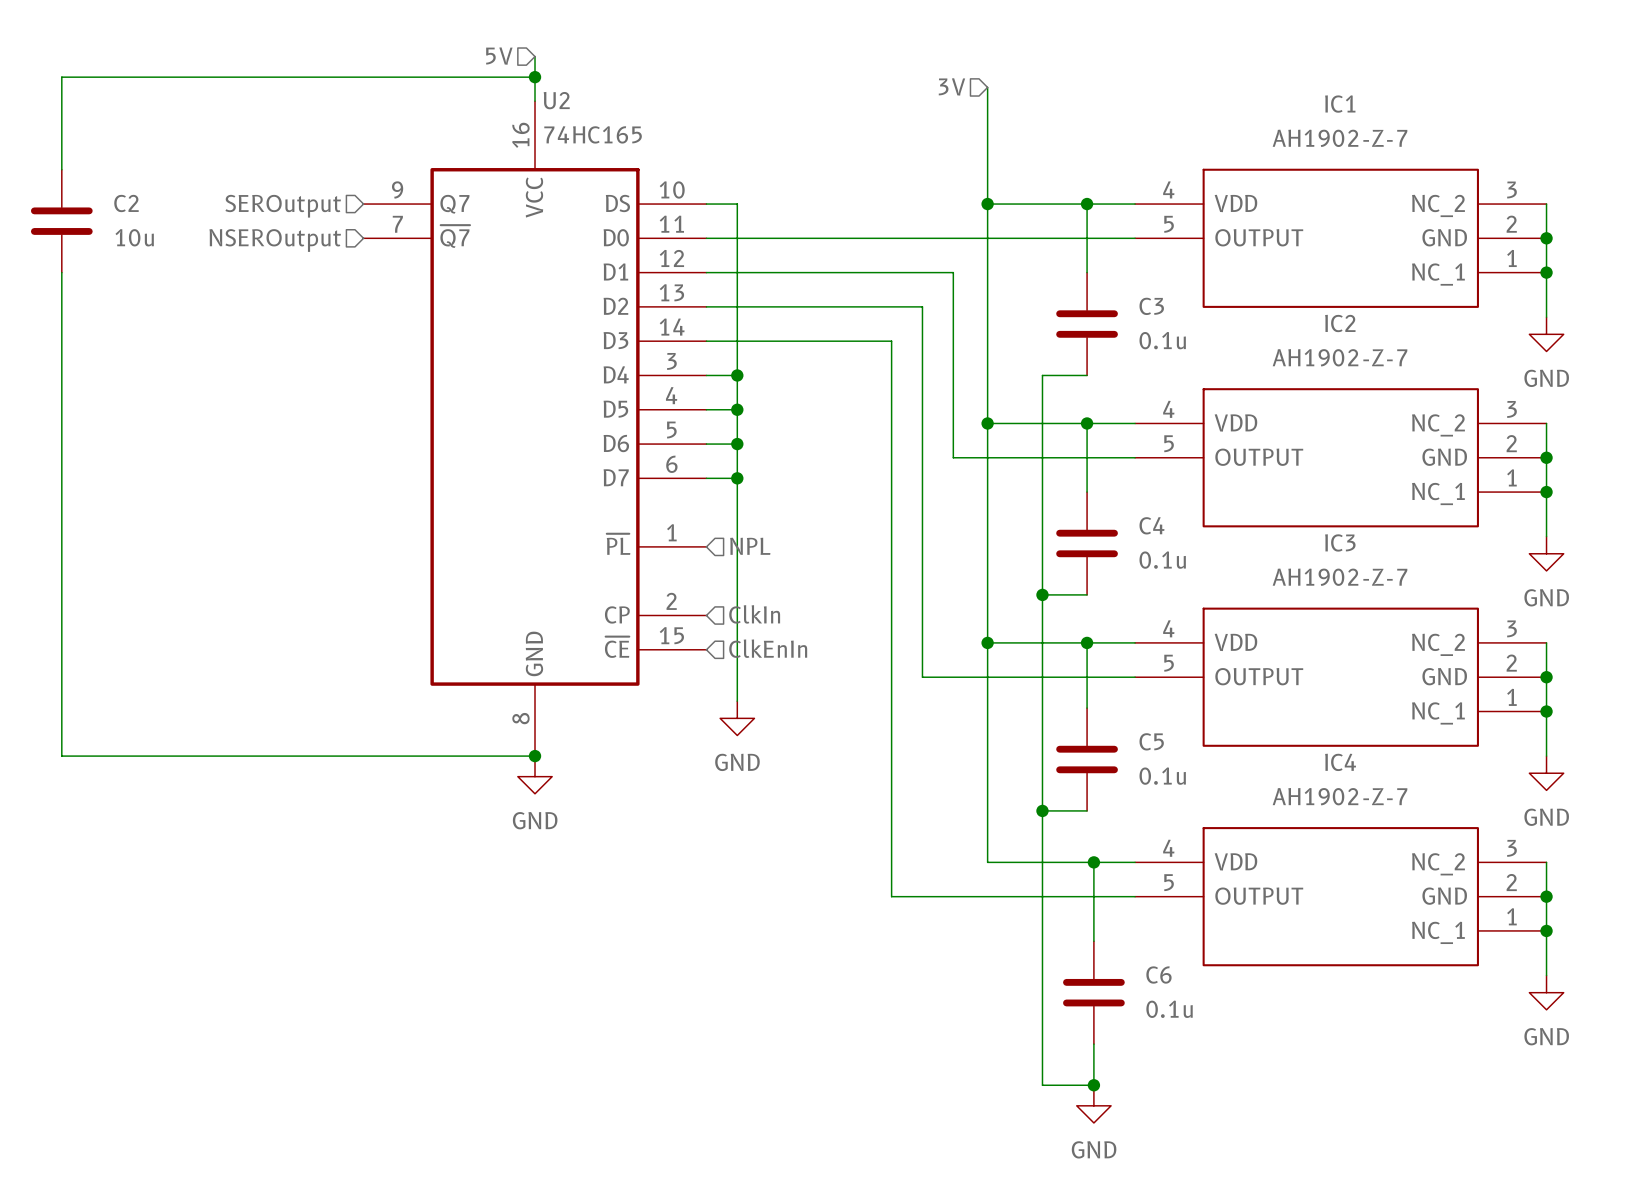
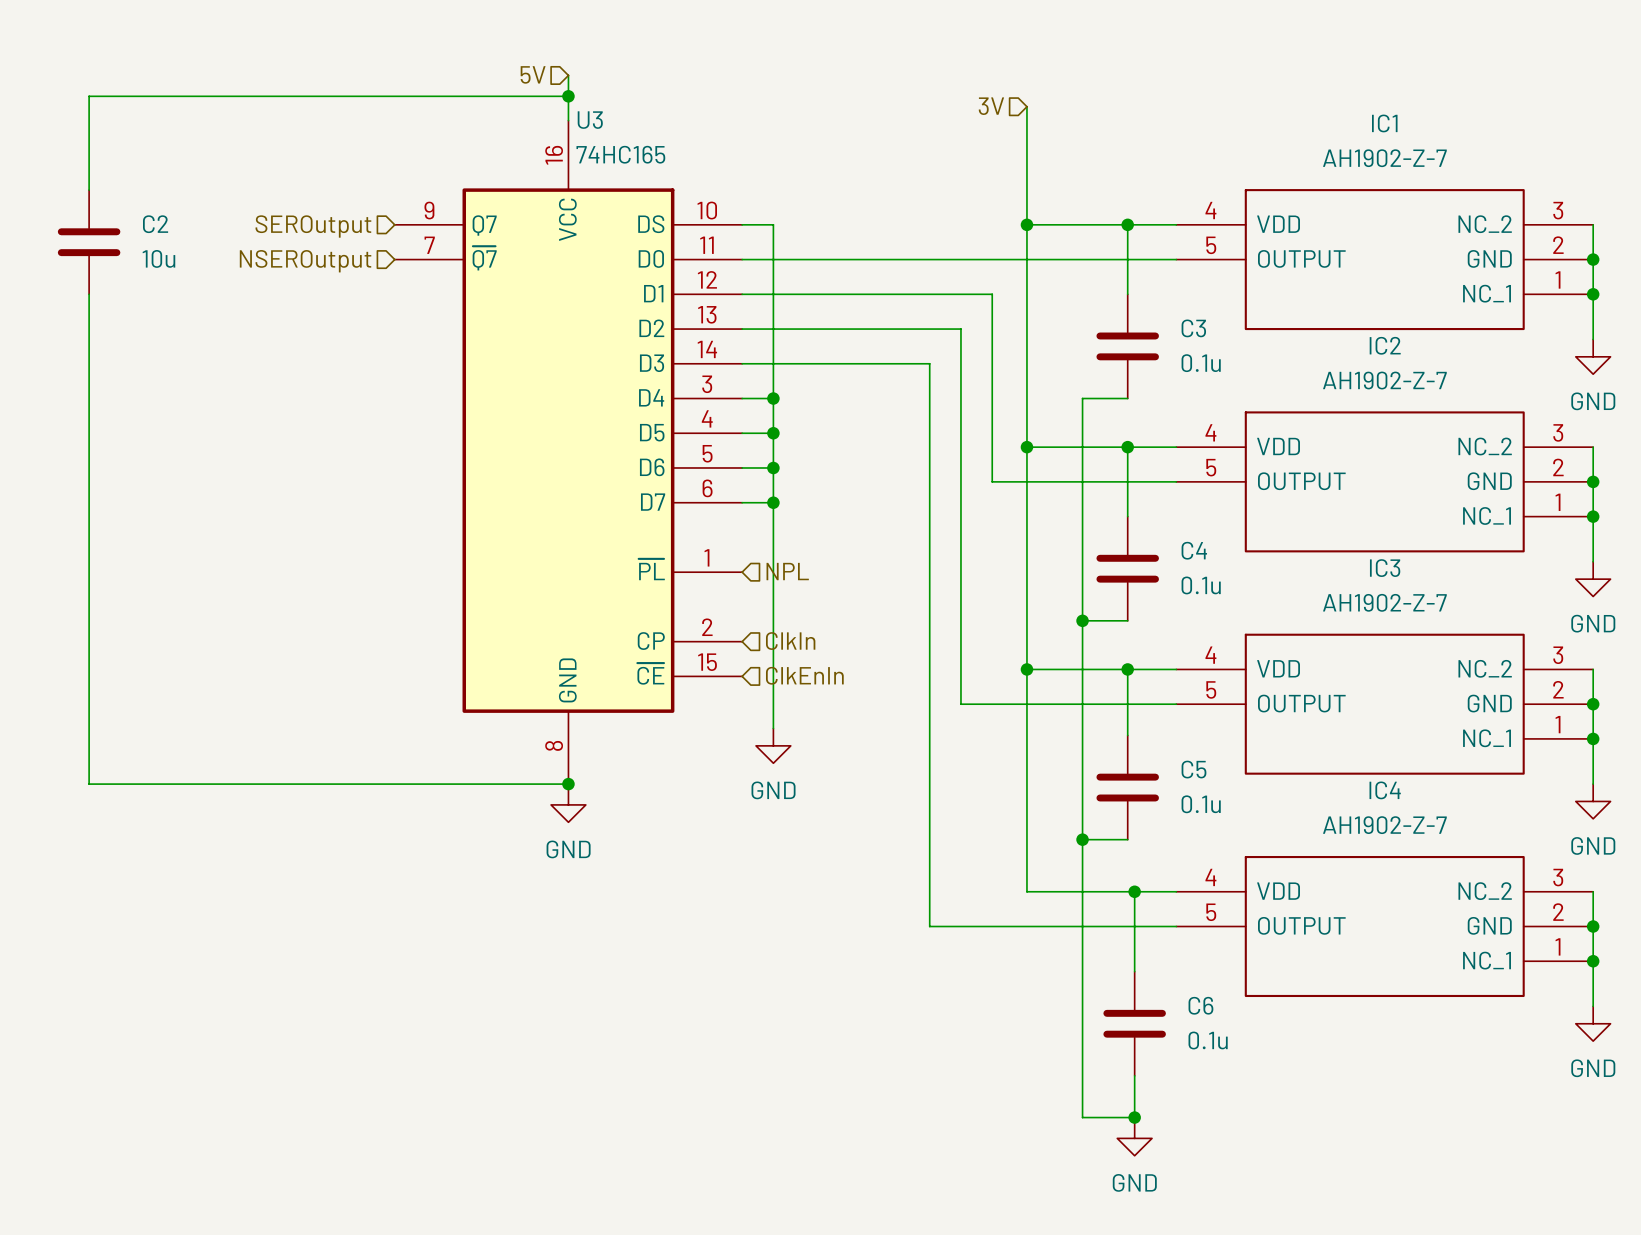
U2 name: U2 (556, 100) -> U3 (590, 120)

